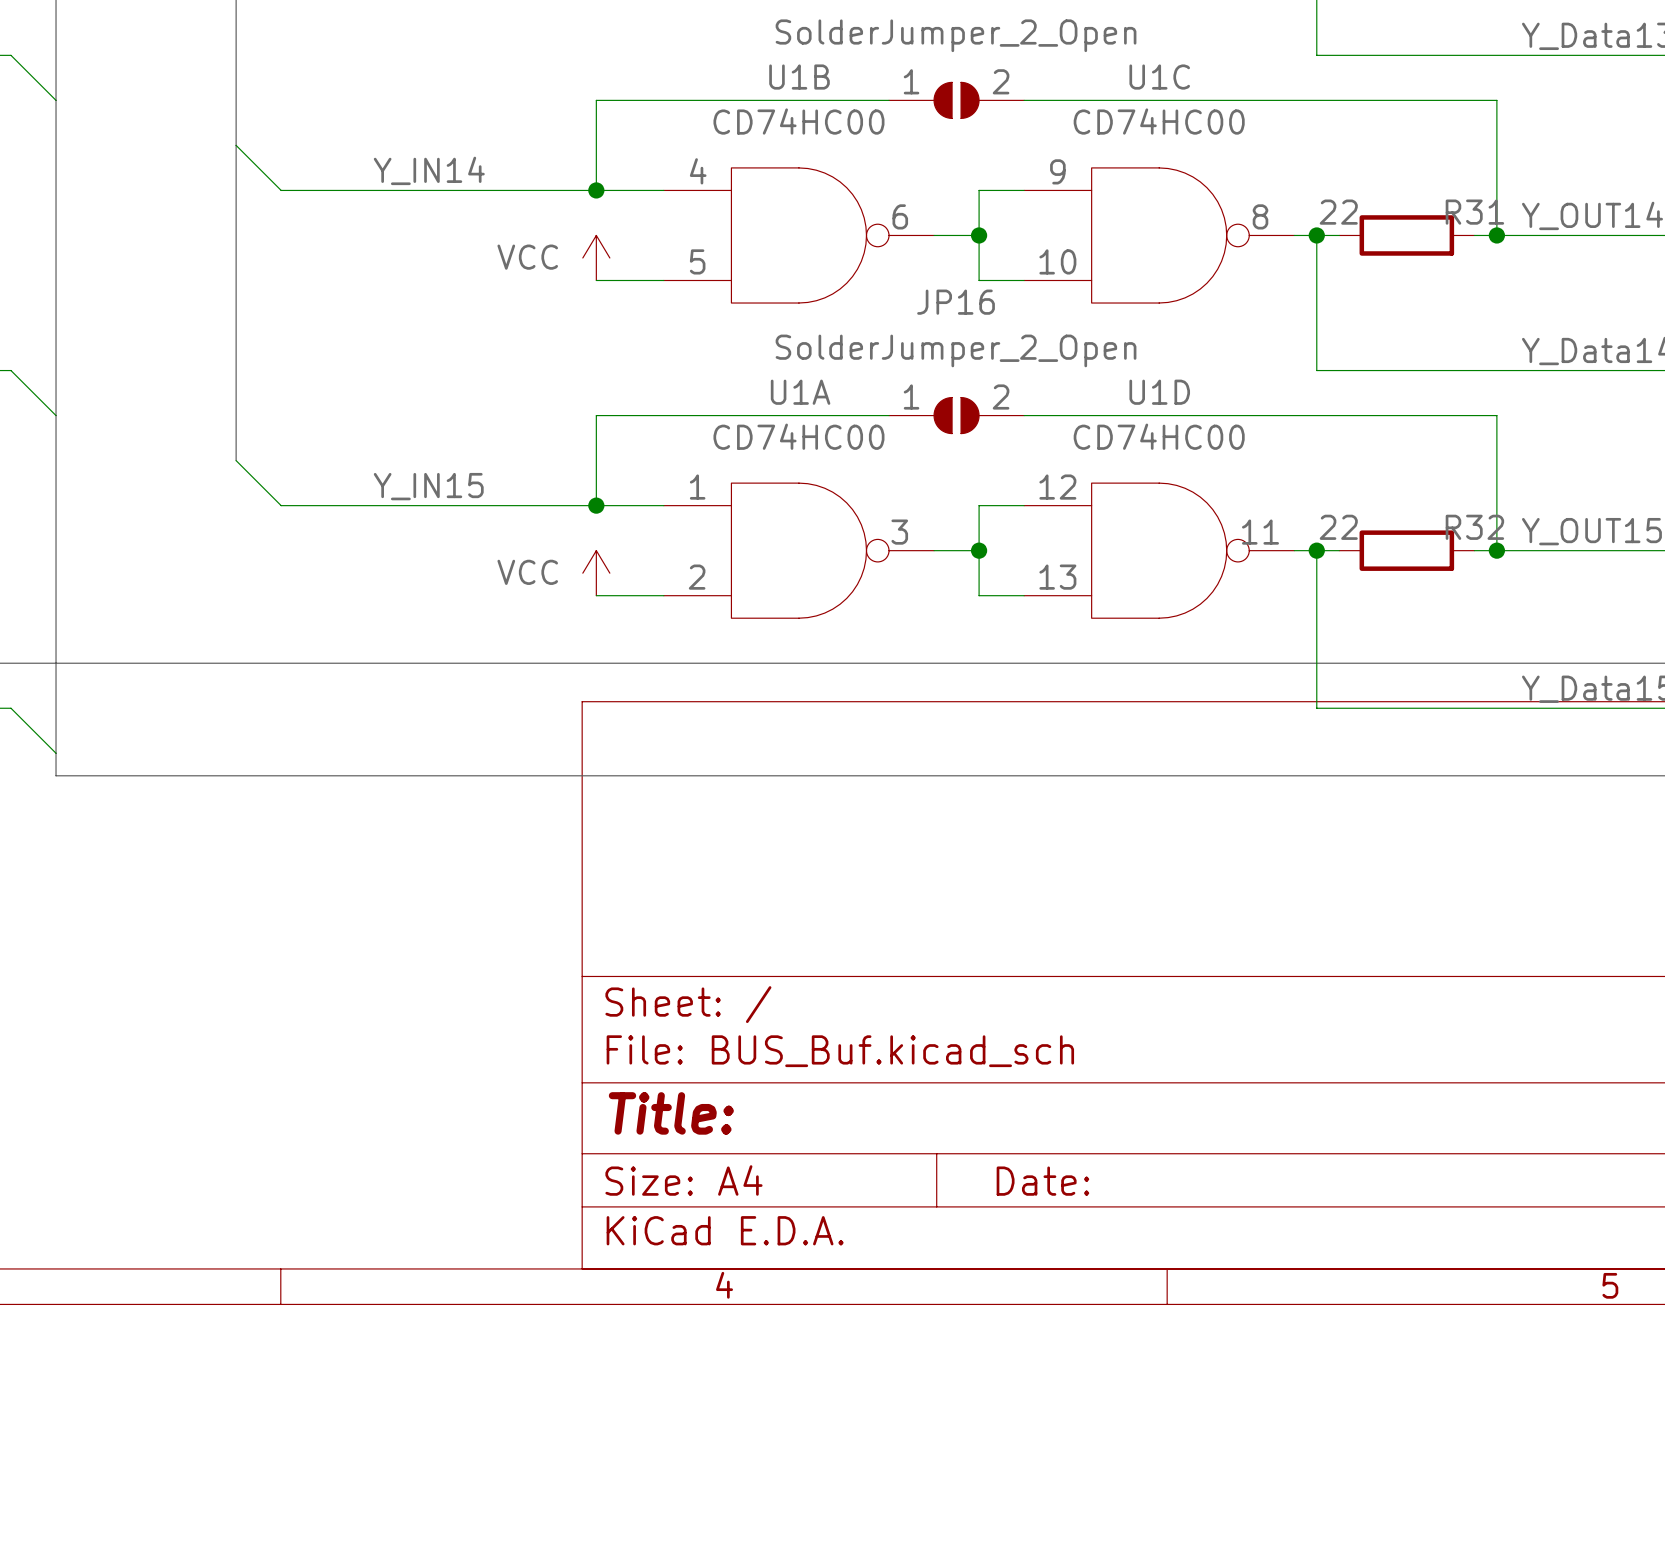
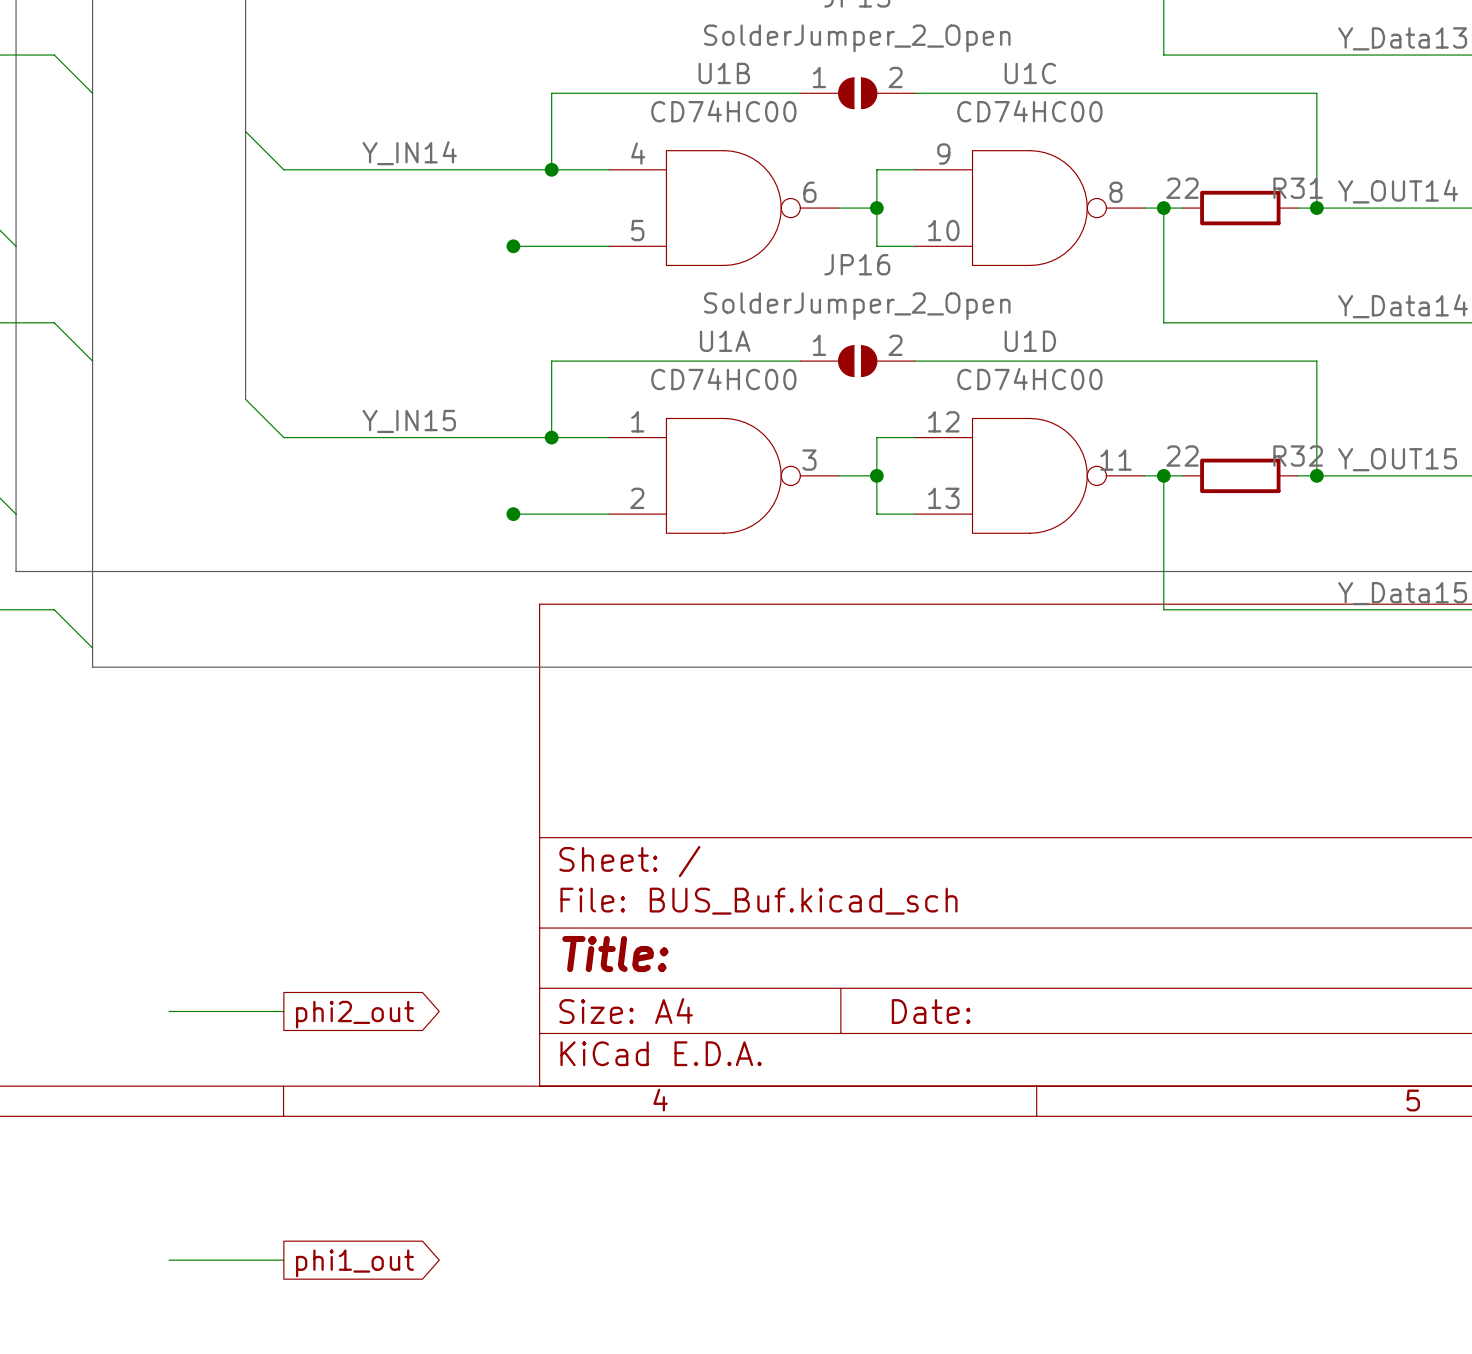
power symbol: VCC (596, 257) -> none
wire: none -> (513, 246) (551, 246)
junction: none -> (513, 246)
power symbol: VCC (596, 573) -> none
wire: none -> (513, 514) (551, 514)
junction: none -> (513, 514)
wire: none -> (169, 1011) (283, 1011)
global label: none -> phi2_out (354, 1014)
wire: none -> (169, 1260) (283, 1260)
global label: none -> phi1_out (354, 1263)

